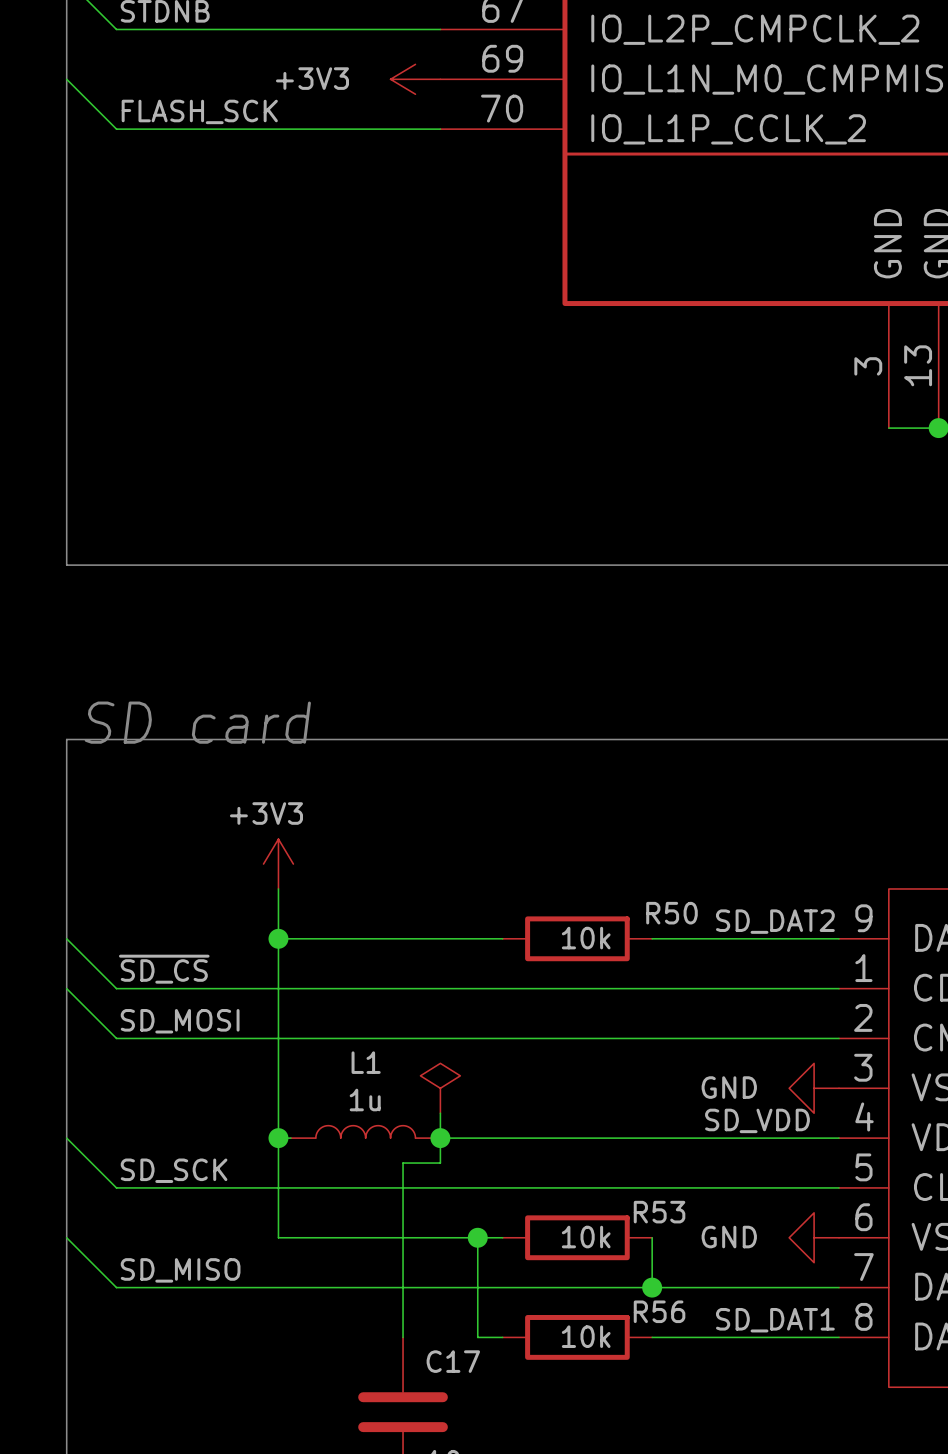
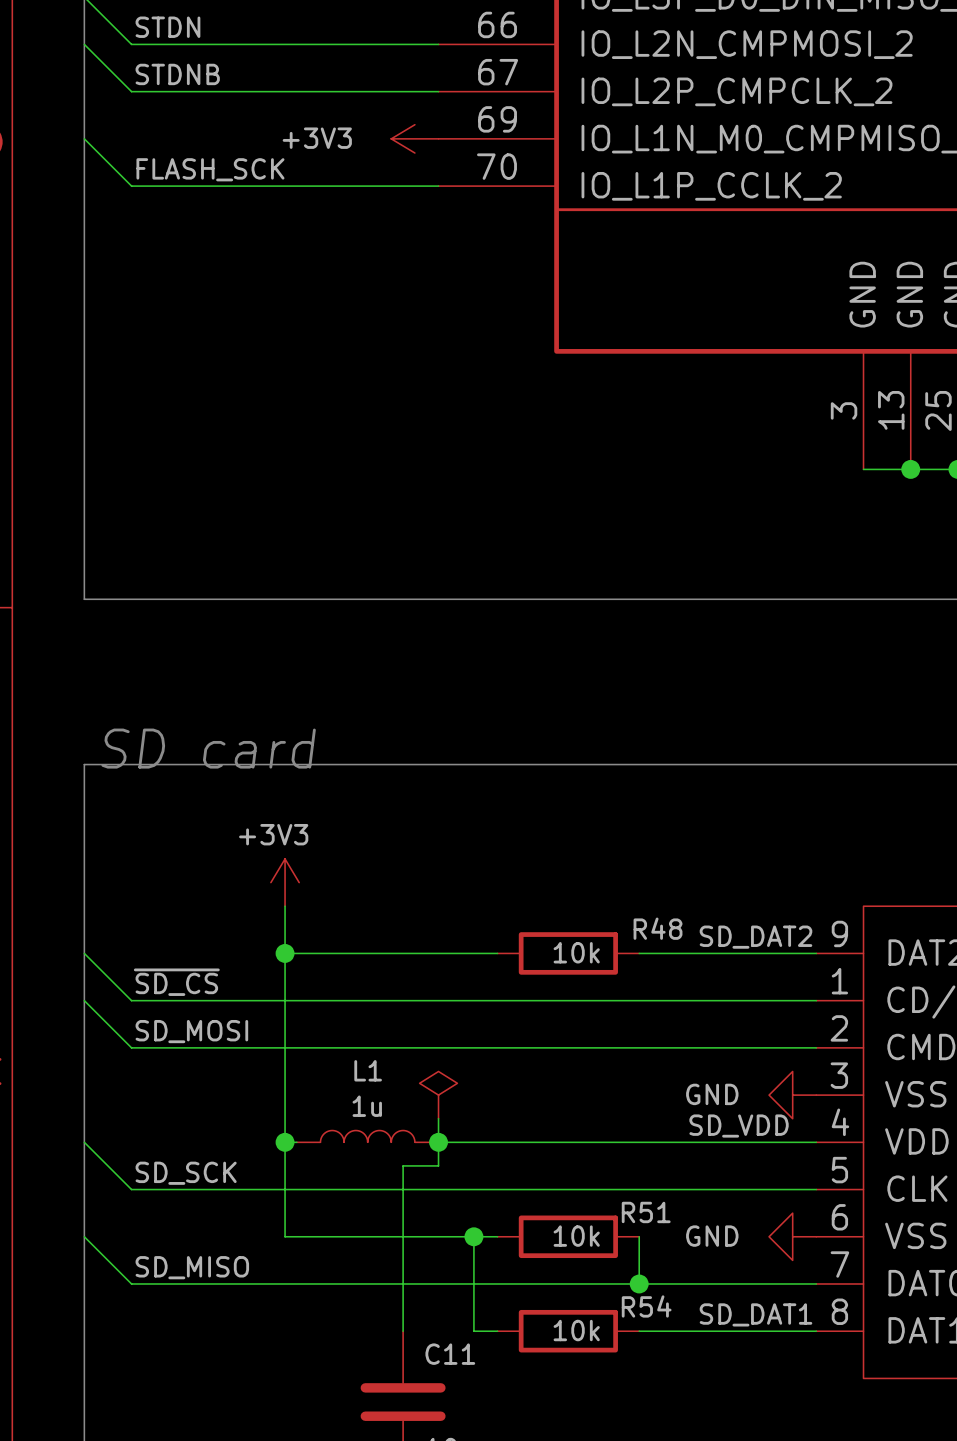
R50 name: R50 (671, 913) -> R48 (658, 928)
R53 name: R53 (659, 1212) -> R51 (646, 1212)
R56 name: R56 (659, 1311) -> R54 (646, 1306)
C17 name: C17 (453, 1361) -> C11 (450, 1354)

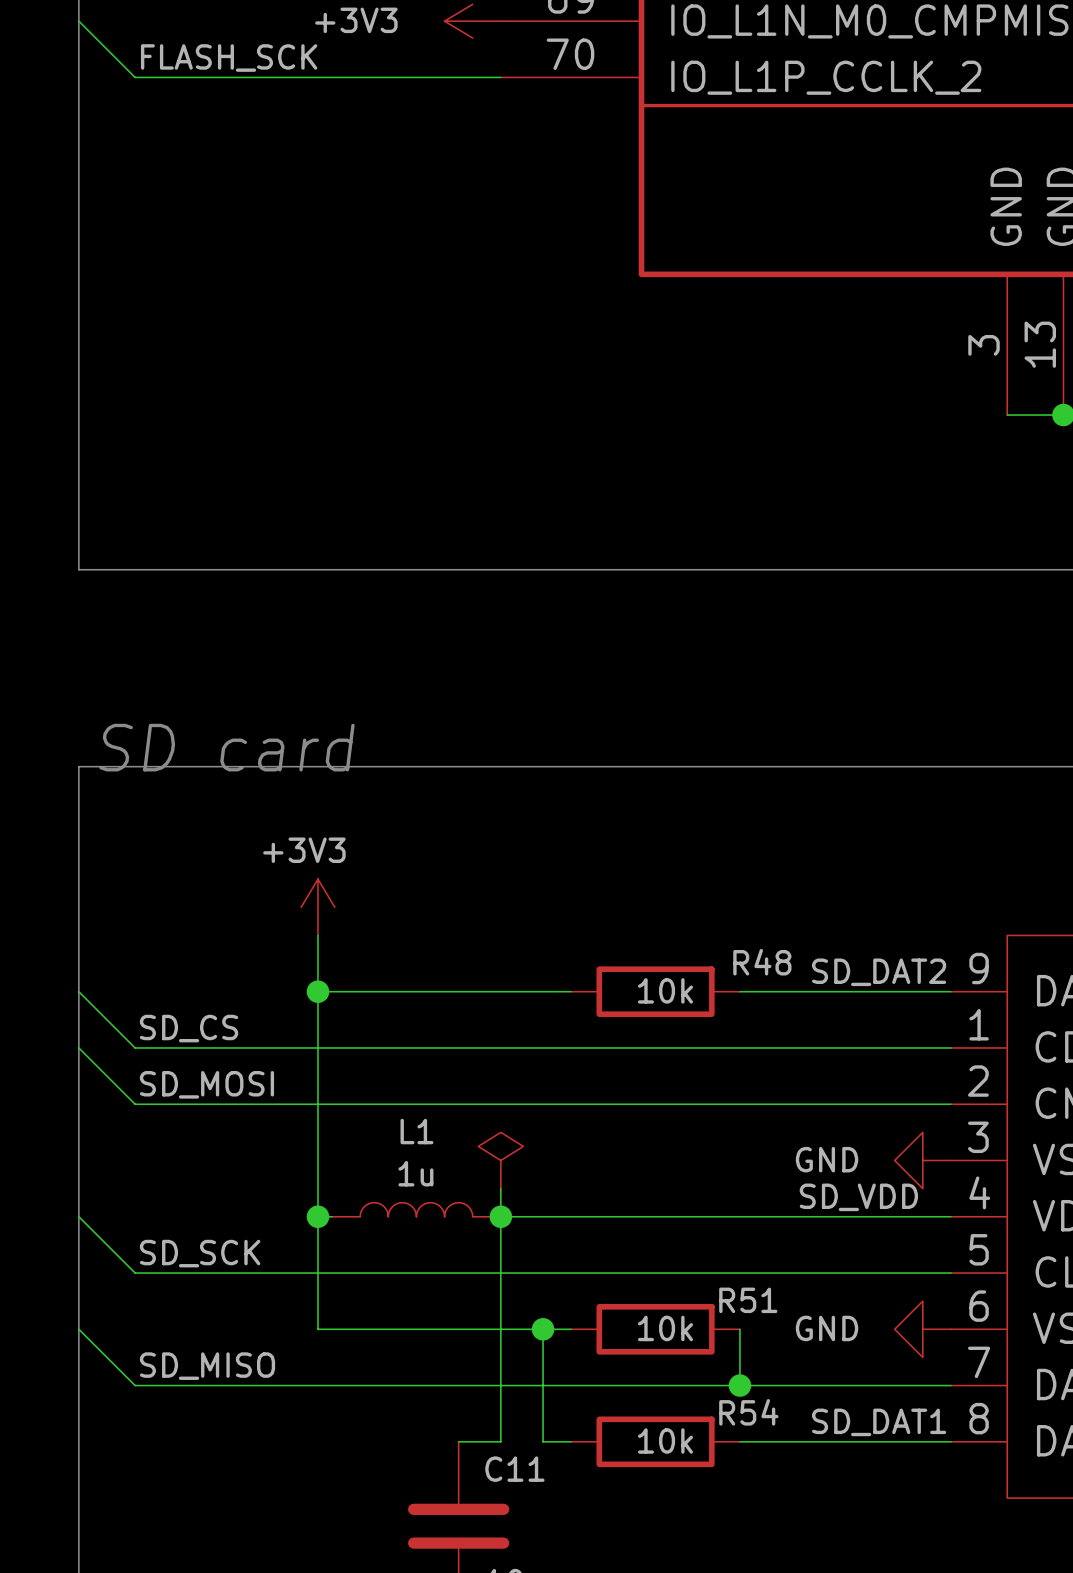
label: ~{SD_CS} (176, 982) -> SD_CS (189, 1028)
wire: (438, 1165) (403, 1165) (403, 1331) -> (500, 1244) (500, 1441) (458, 1441)

